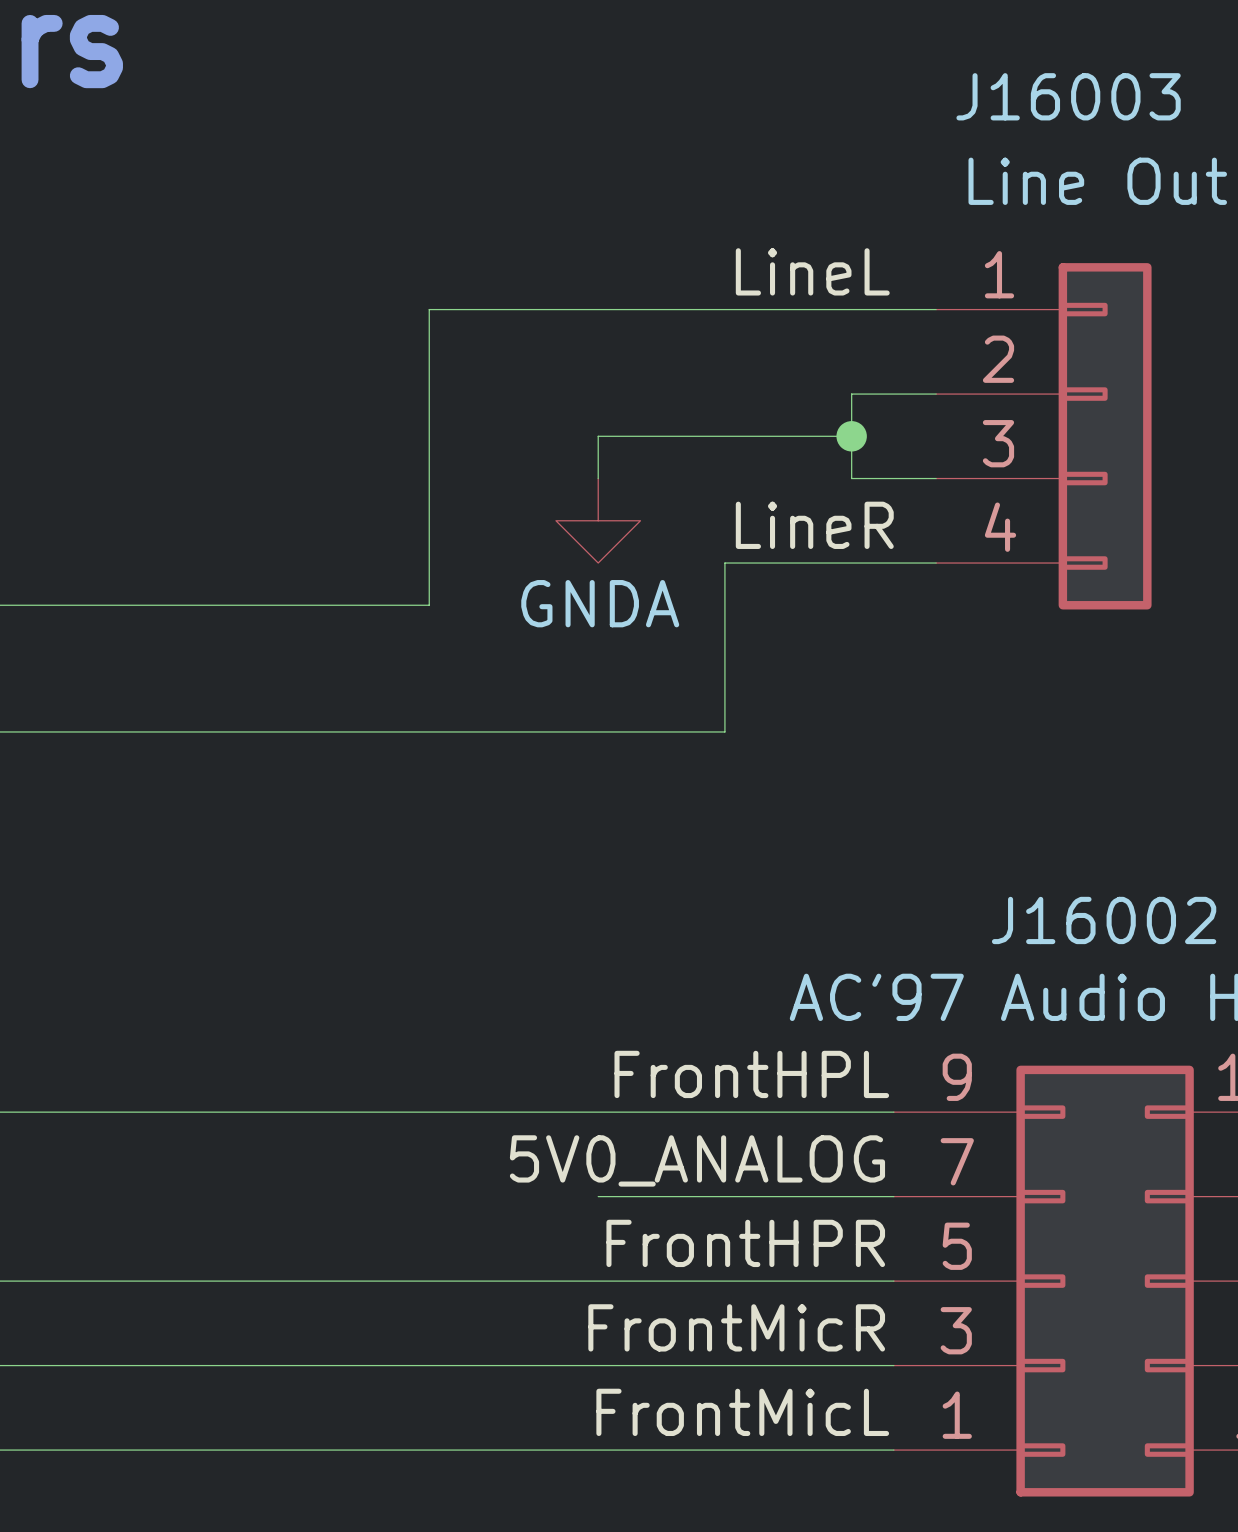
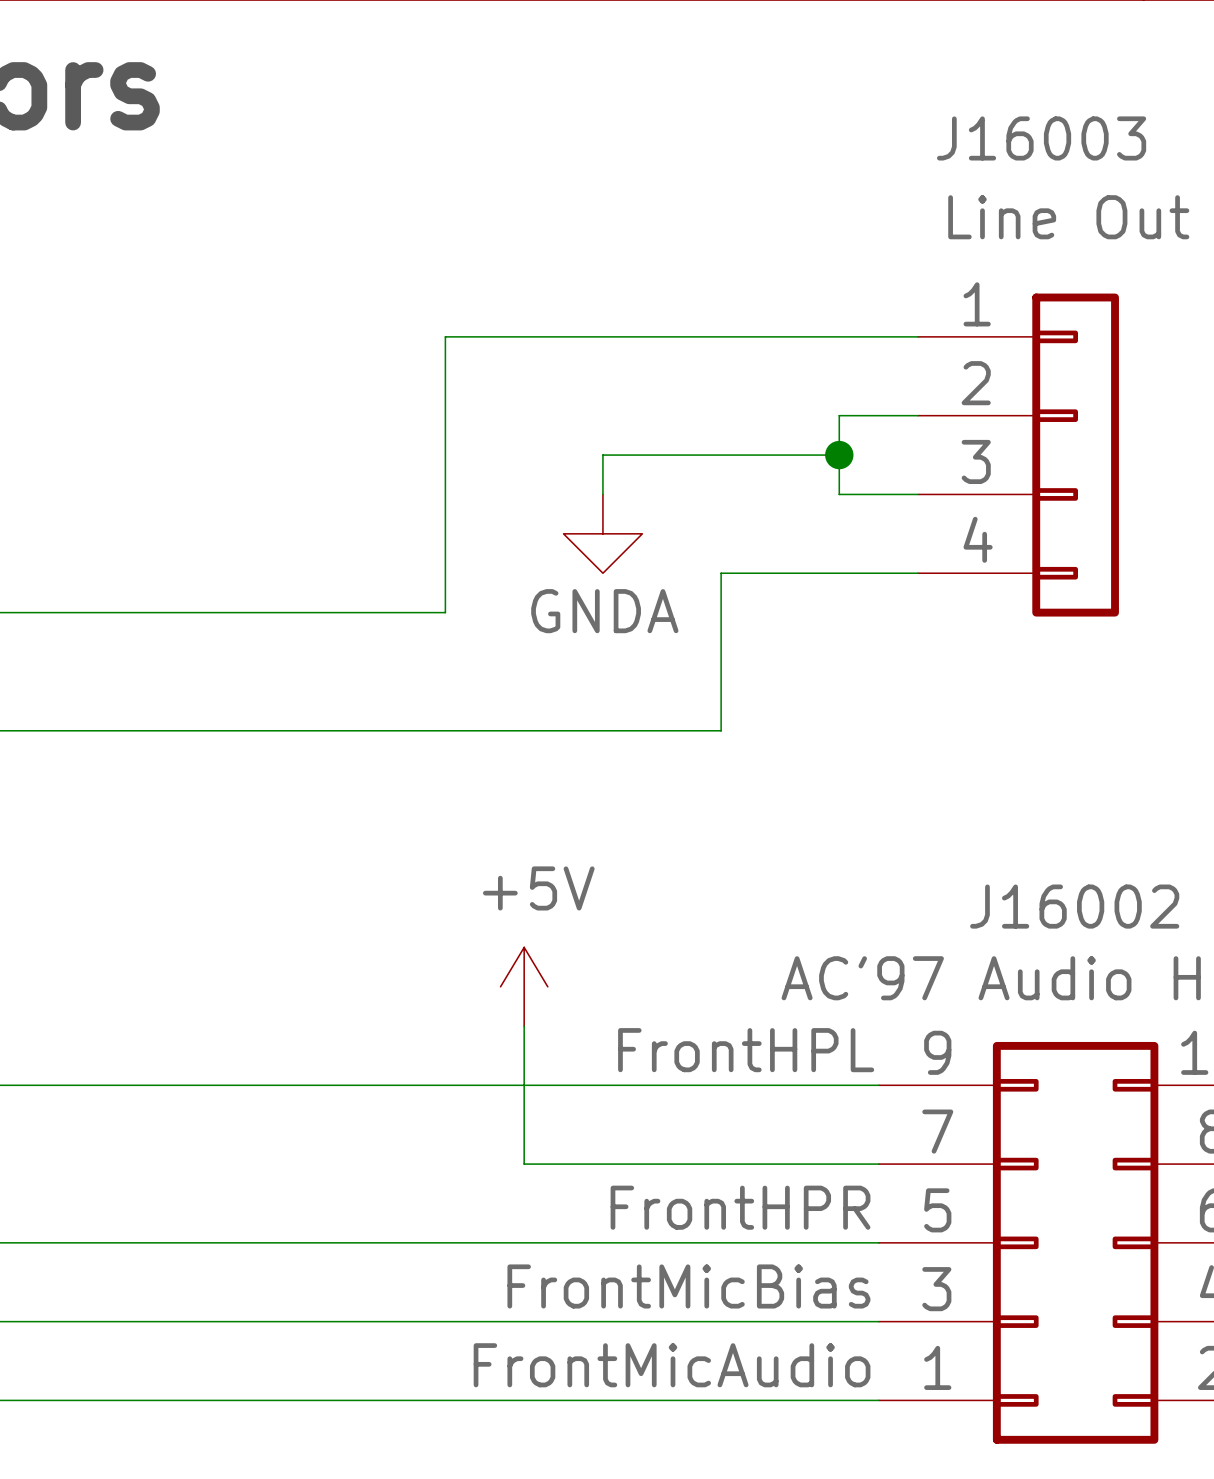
label: LineL (812, 271) -> none
label: LineR (814, 525) -> none
power symbol: none -> +5V (524, 986)
wire: none -> (524, 1026) (524, 1164) (602, 1164)
label: 5V0_ANALOG (697, 1160) -> none
label: FrontMicR (736, 1327) -> FrontMicBias (688, 1286)
label: FrontMicL (742, 1412) -> FrontMicAudio (672, 1365)

